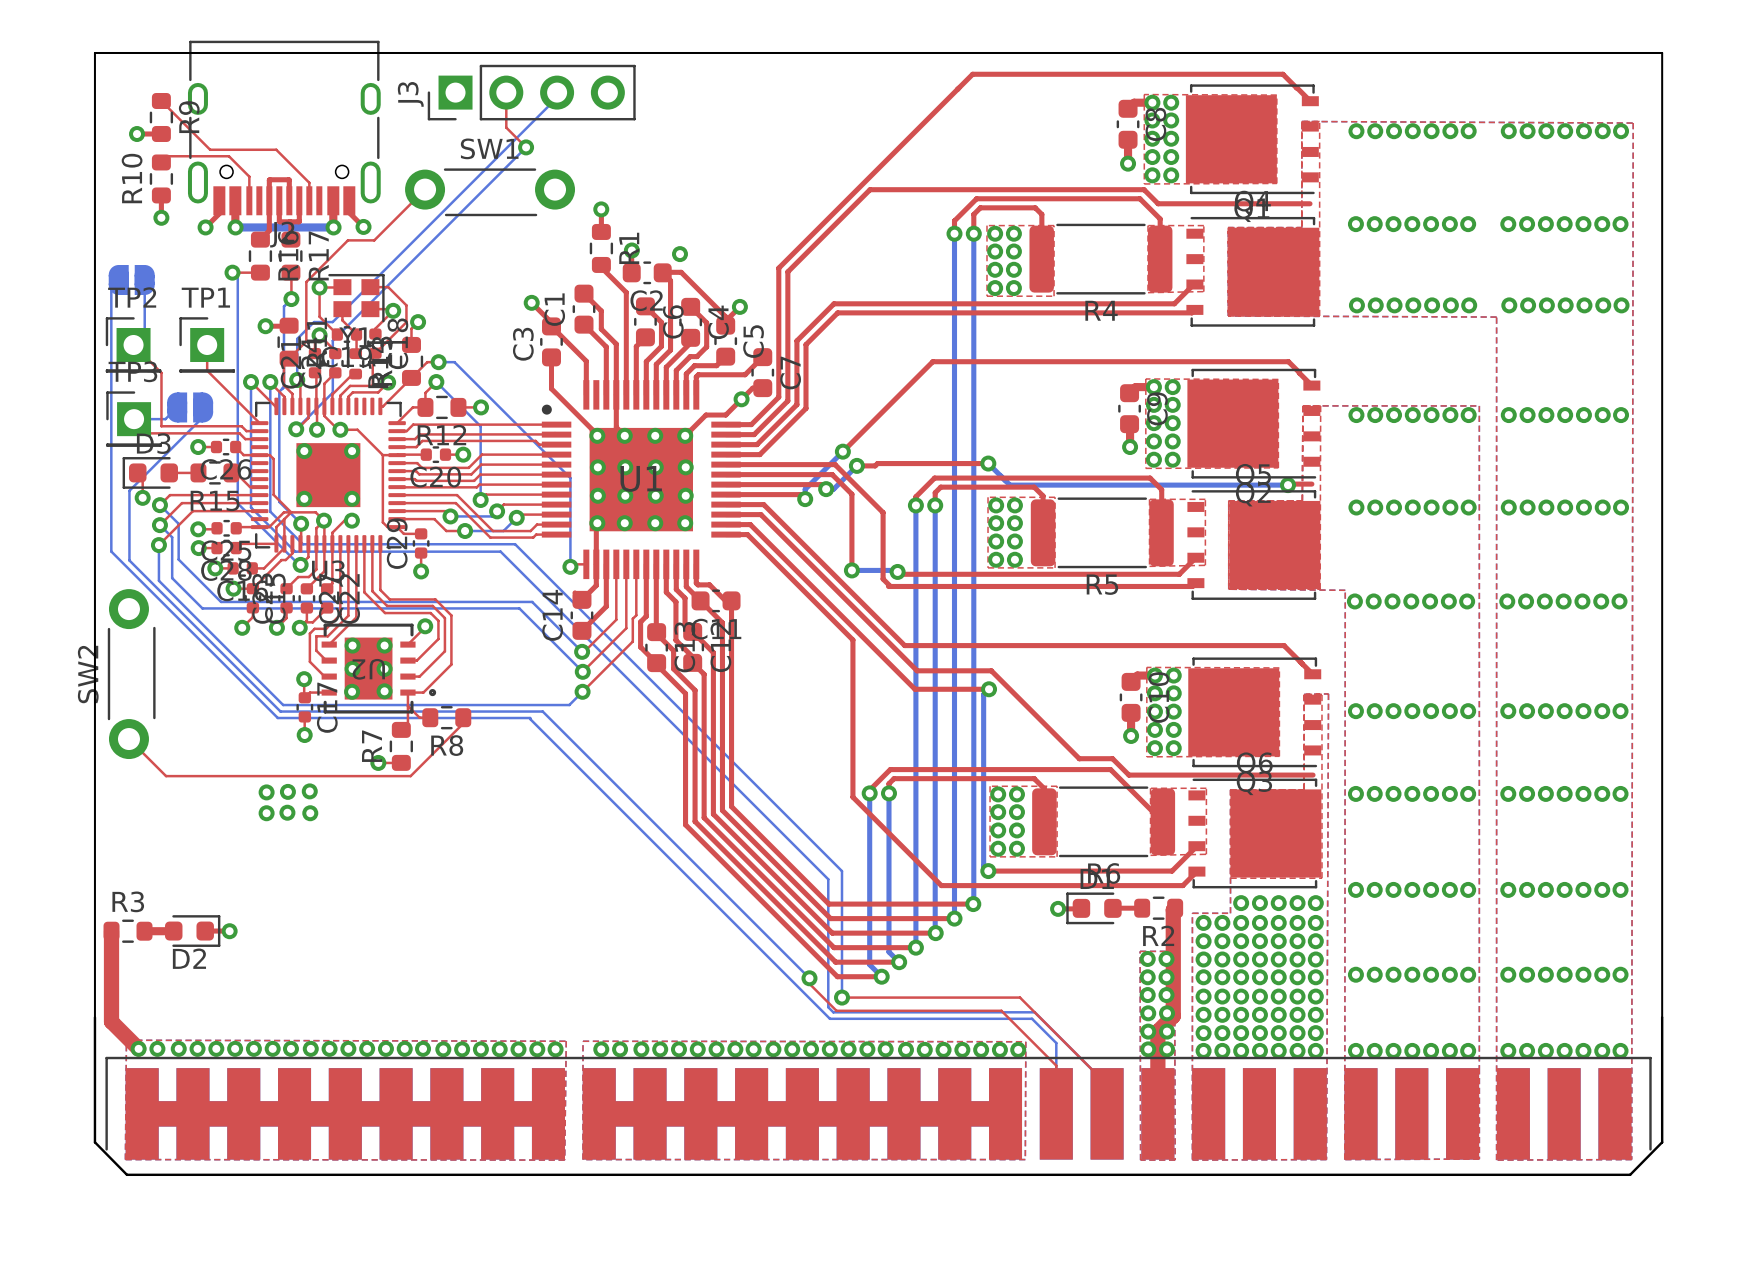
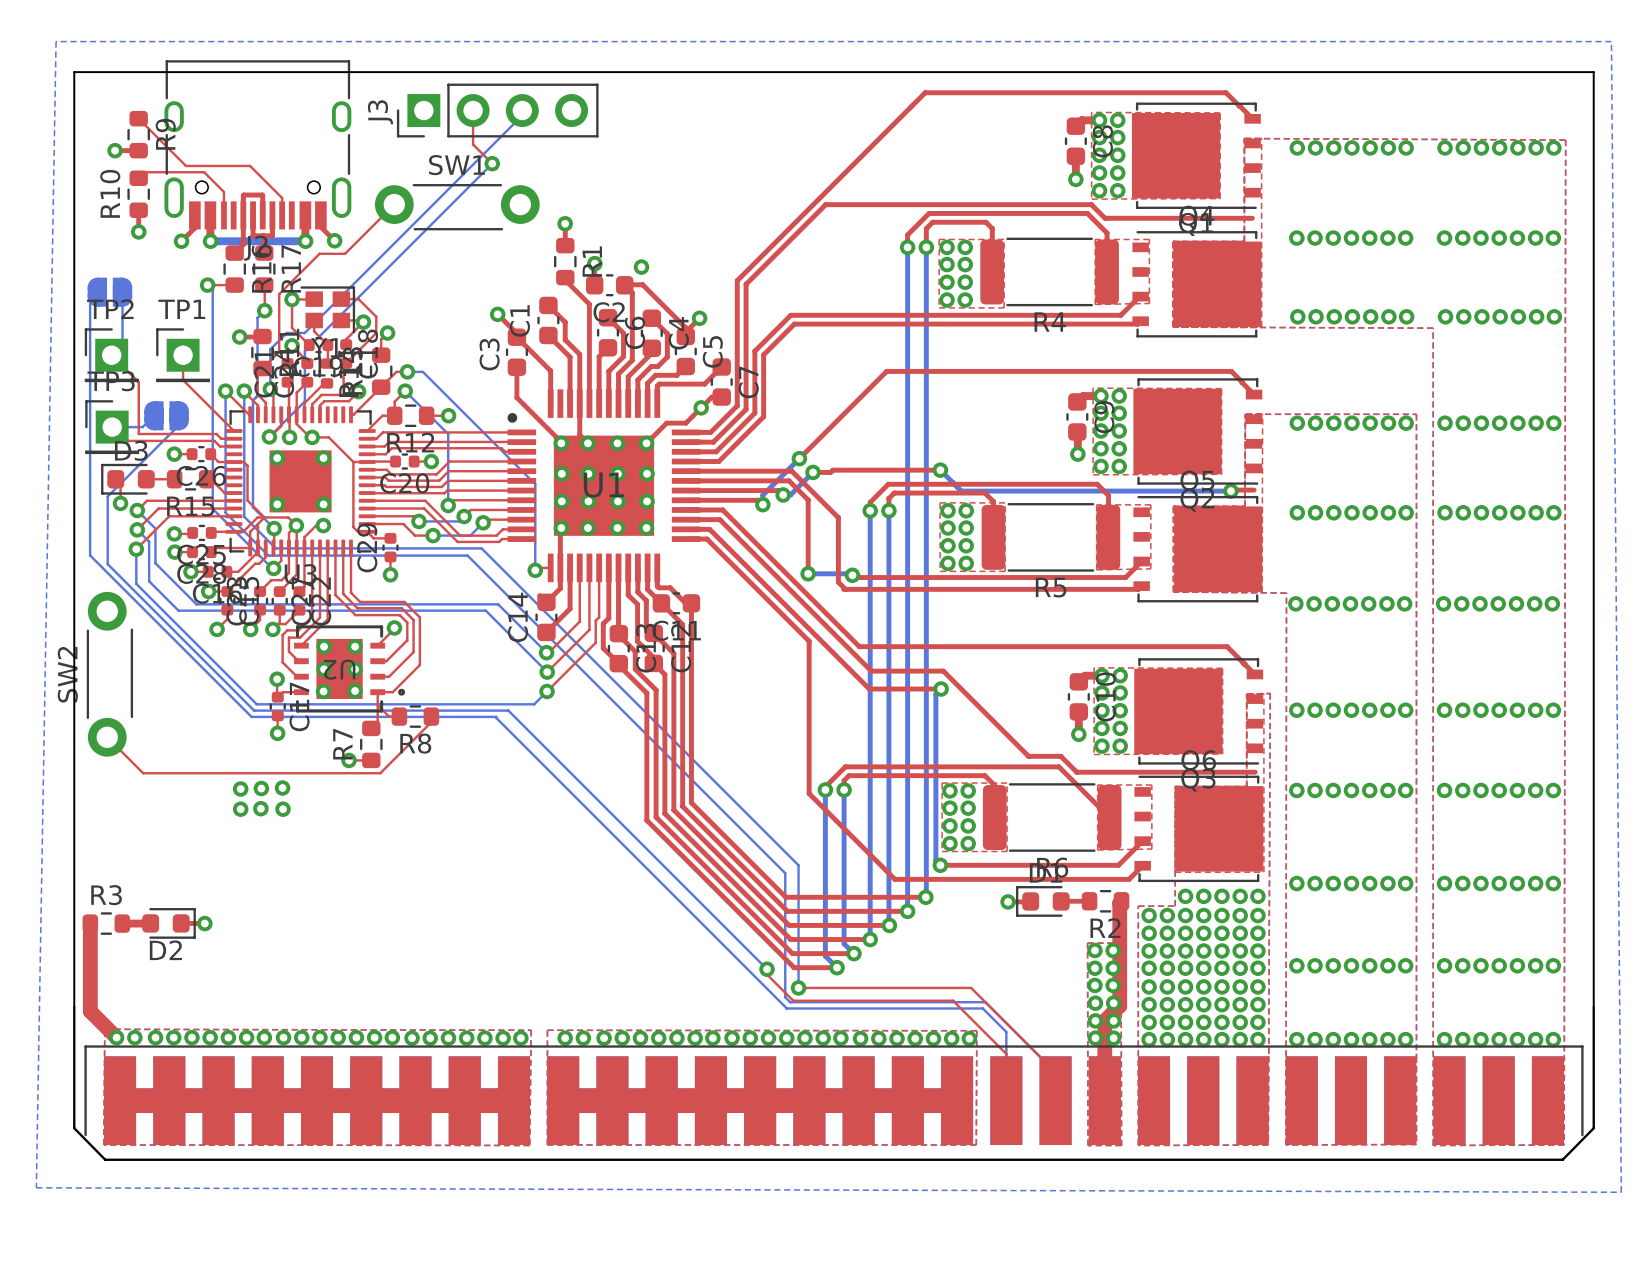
bottom zone outline: none -> (56, 41) (36, 1187) (1621, 1192) (1611, 41) (56, 41)

